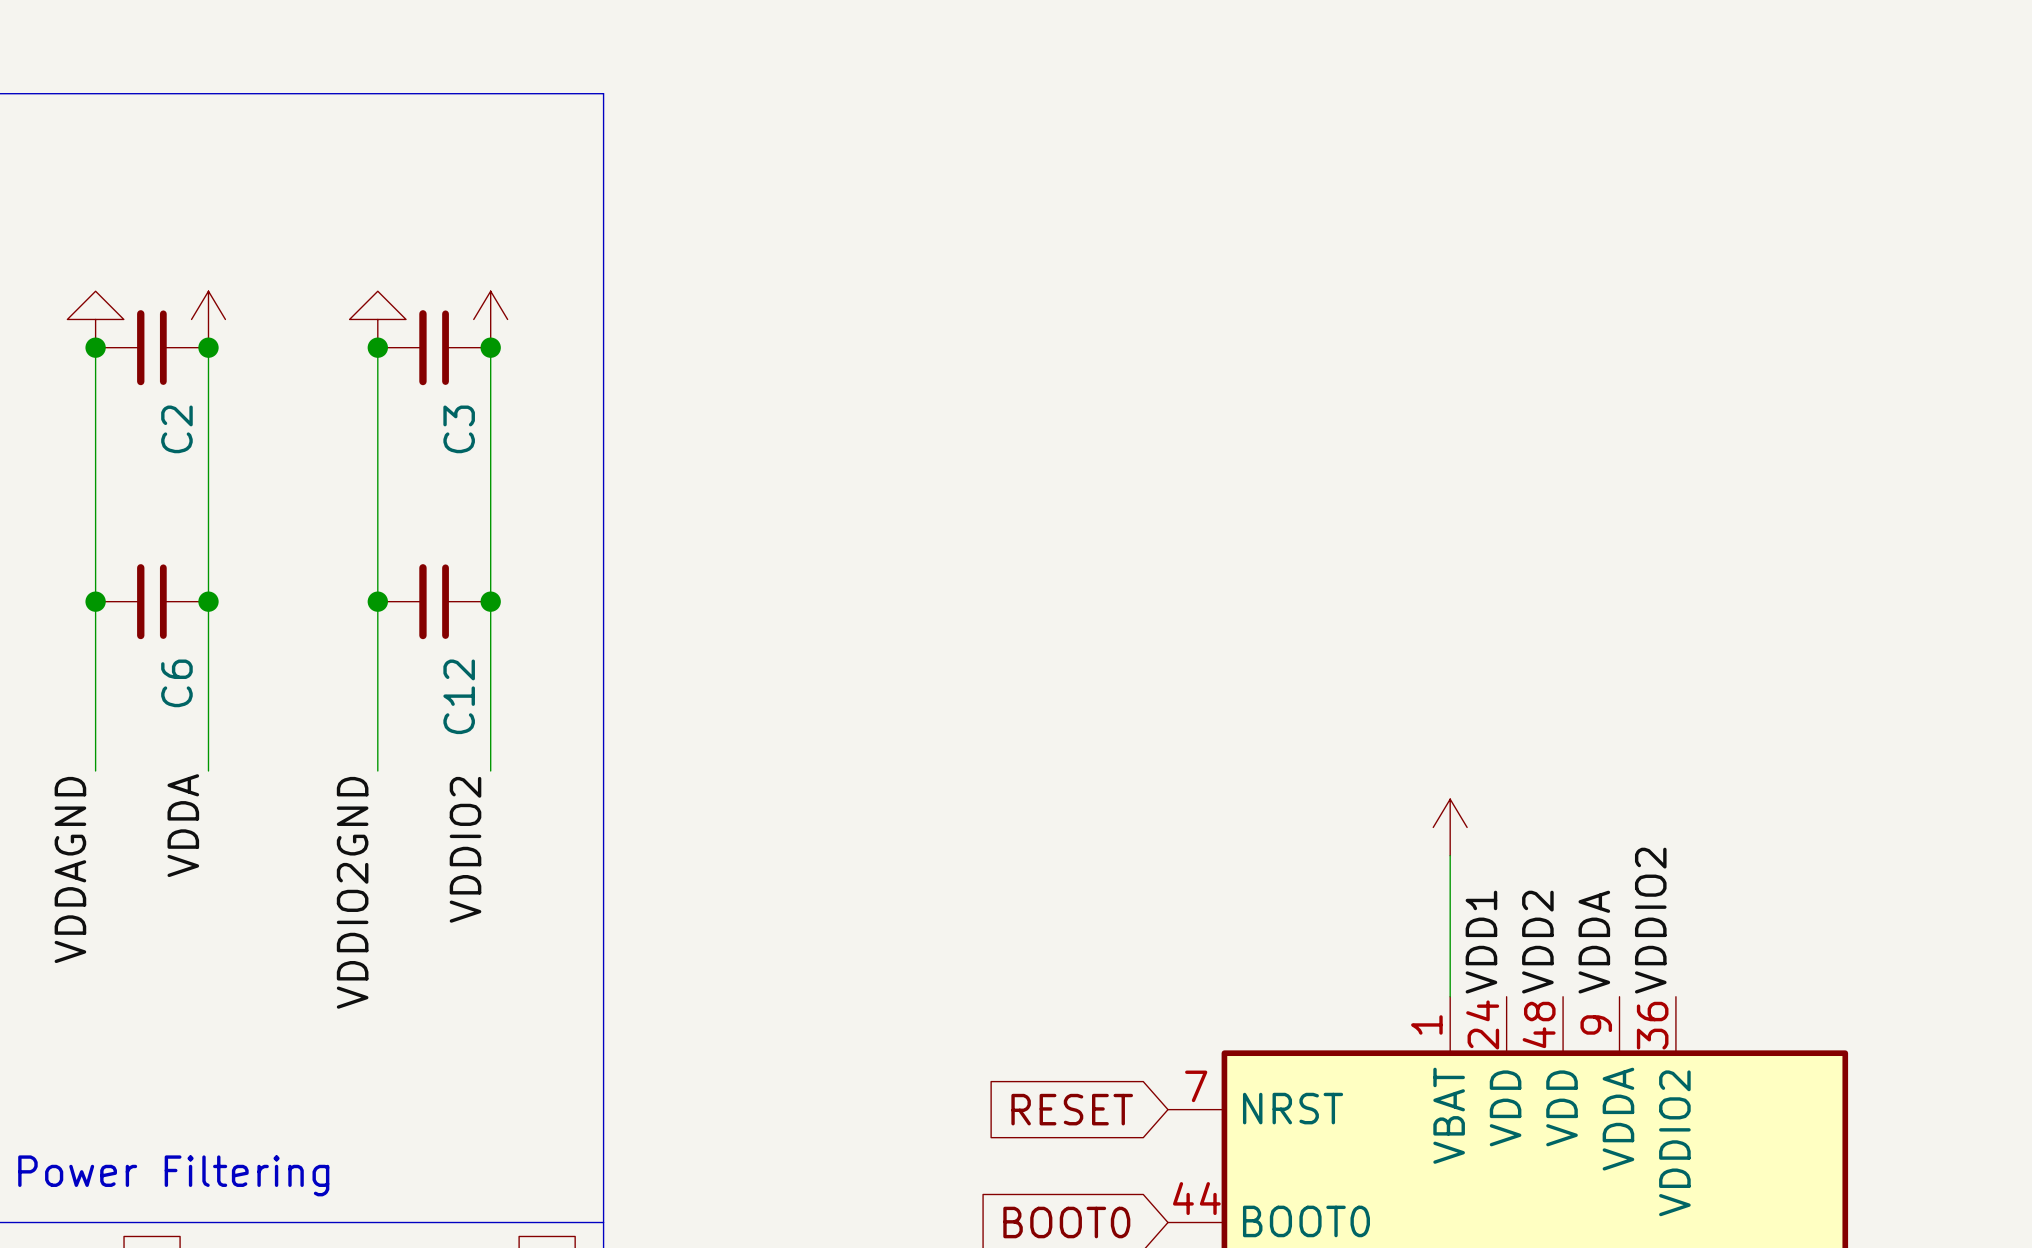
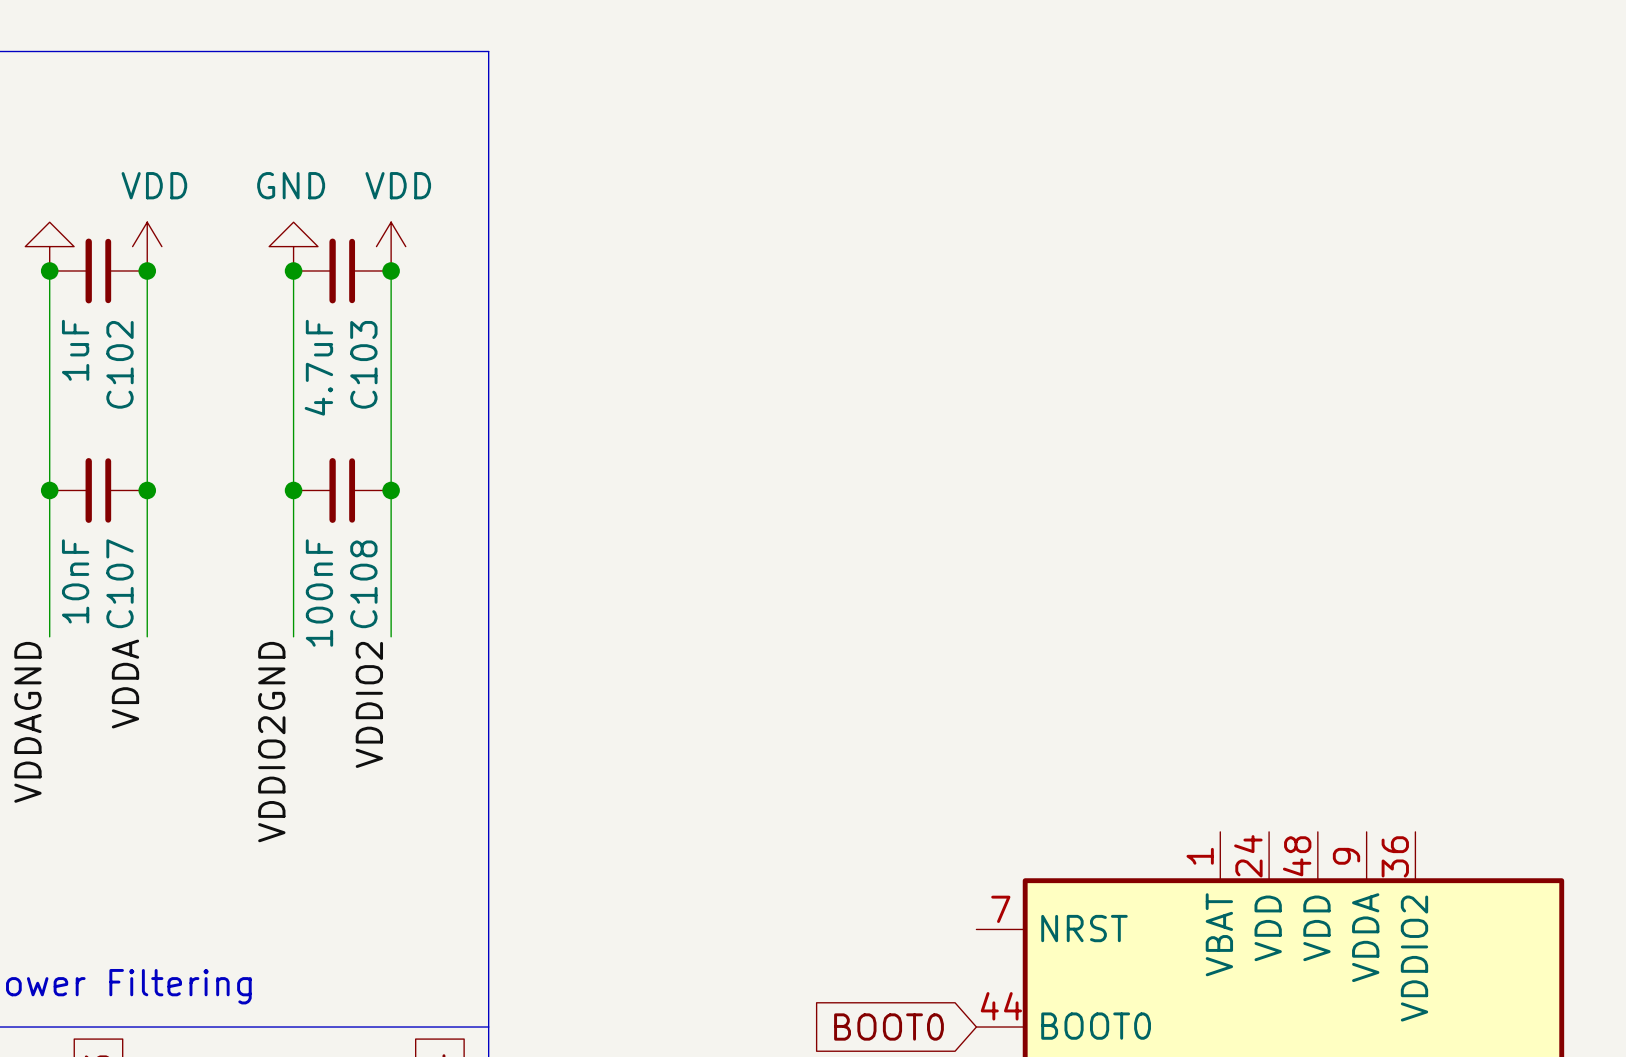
power symbol text: none -> VDD (154, 185)
power symbol text: none -> GND (291, 185)
power symbol text: none -> VDD (398, 185)
C2 name: C2 (176, 429) -> C102 (119, 364)
C3 name: C3 (459, 429) -> C103 (363, 364)
C2 value: none -> 1uF (75, 350)
C3 value: none -> 4.7uF (318, 367)
C6 name: C6 (176, 683) -> C107 (119, 583)
C12 name: C12 (459, 696) -> C108 (363, 584)
C6 value: none -> 10nF (75, 581)
C12 value: none -> 100nF (319, 593)
power symbol: (1450, 827) -> none
wire: (1450, 855) (1450, 996) -> none
label: VDDIO2 (1650, 920) -> none
label: VDD1 (1481, 942) -> none
label: VDD2 (1537, 942) -> none
label: VDDA (1594, 942) -> none
global label: RESET (1072, 1109) -> none

